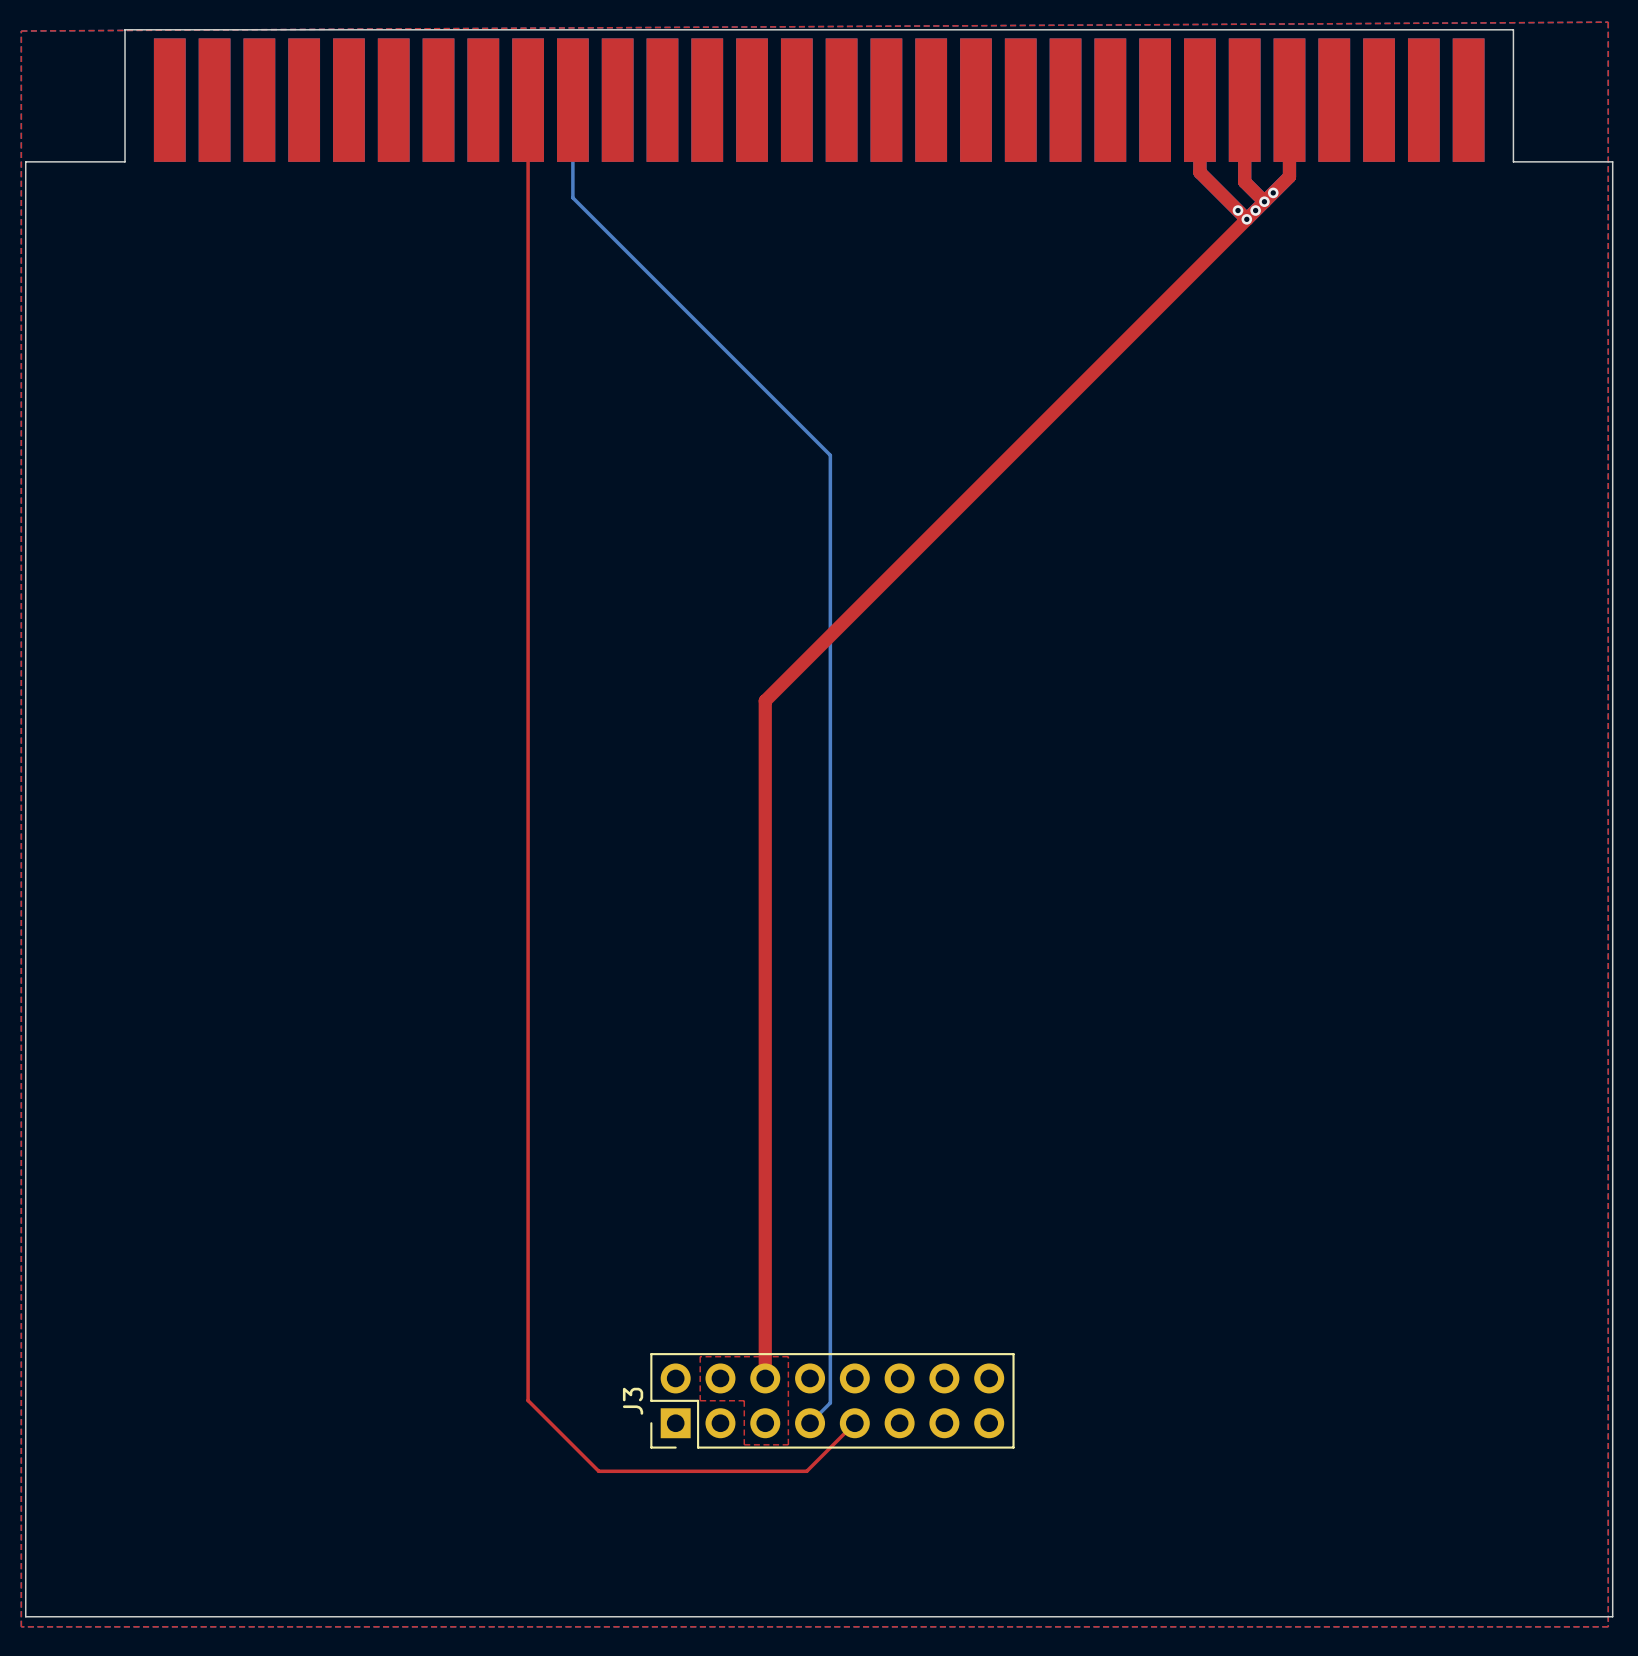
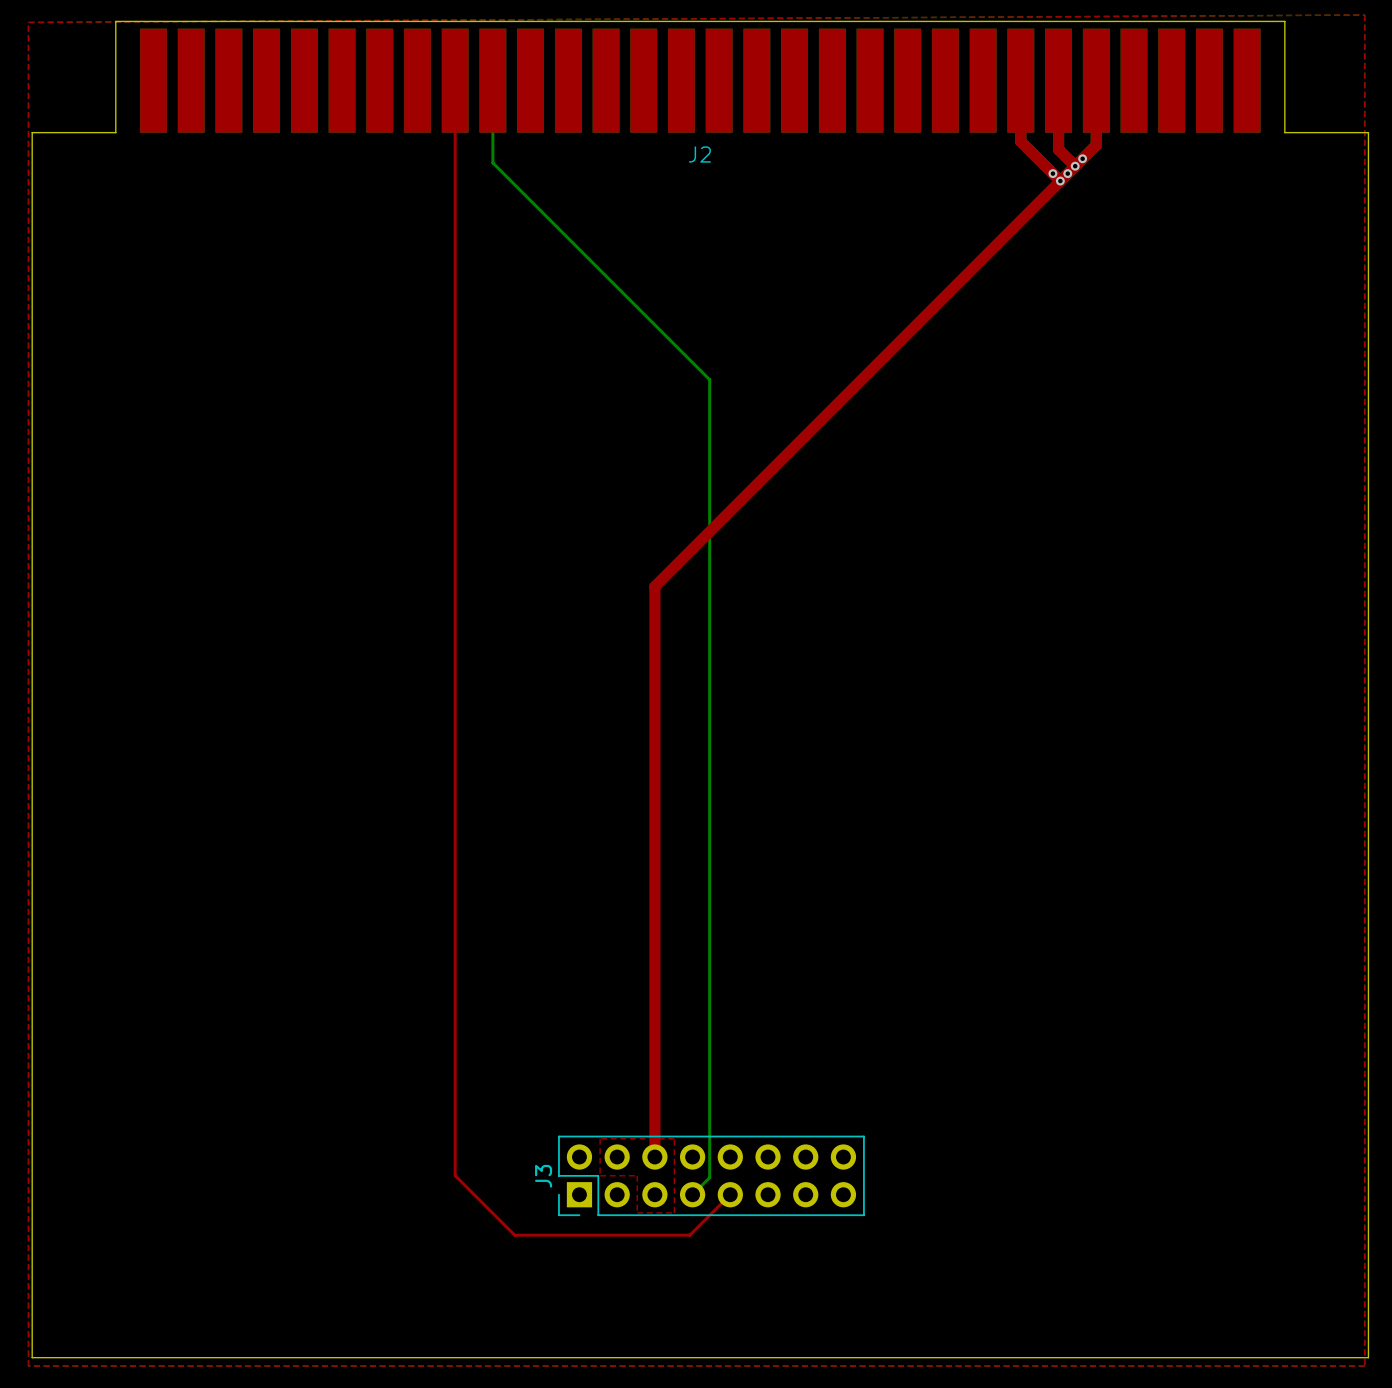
J2 name: none -> J2 (699, 154)

